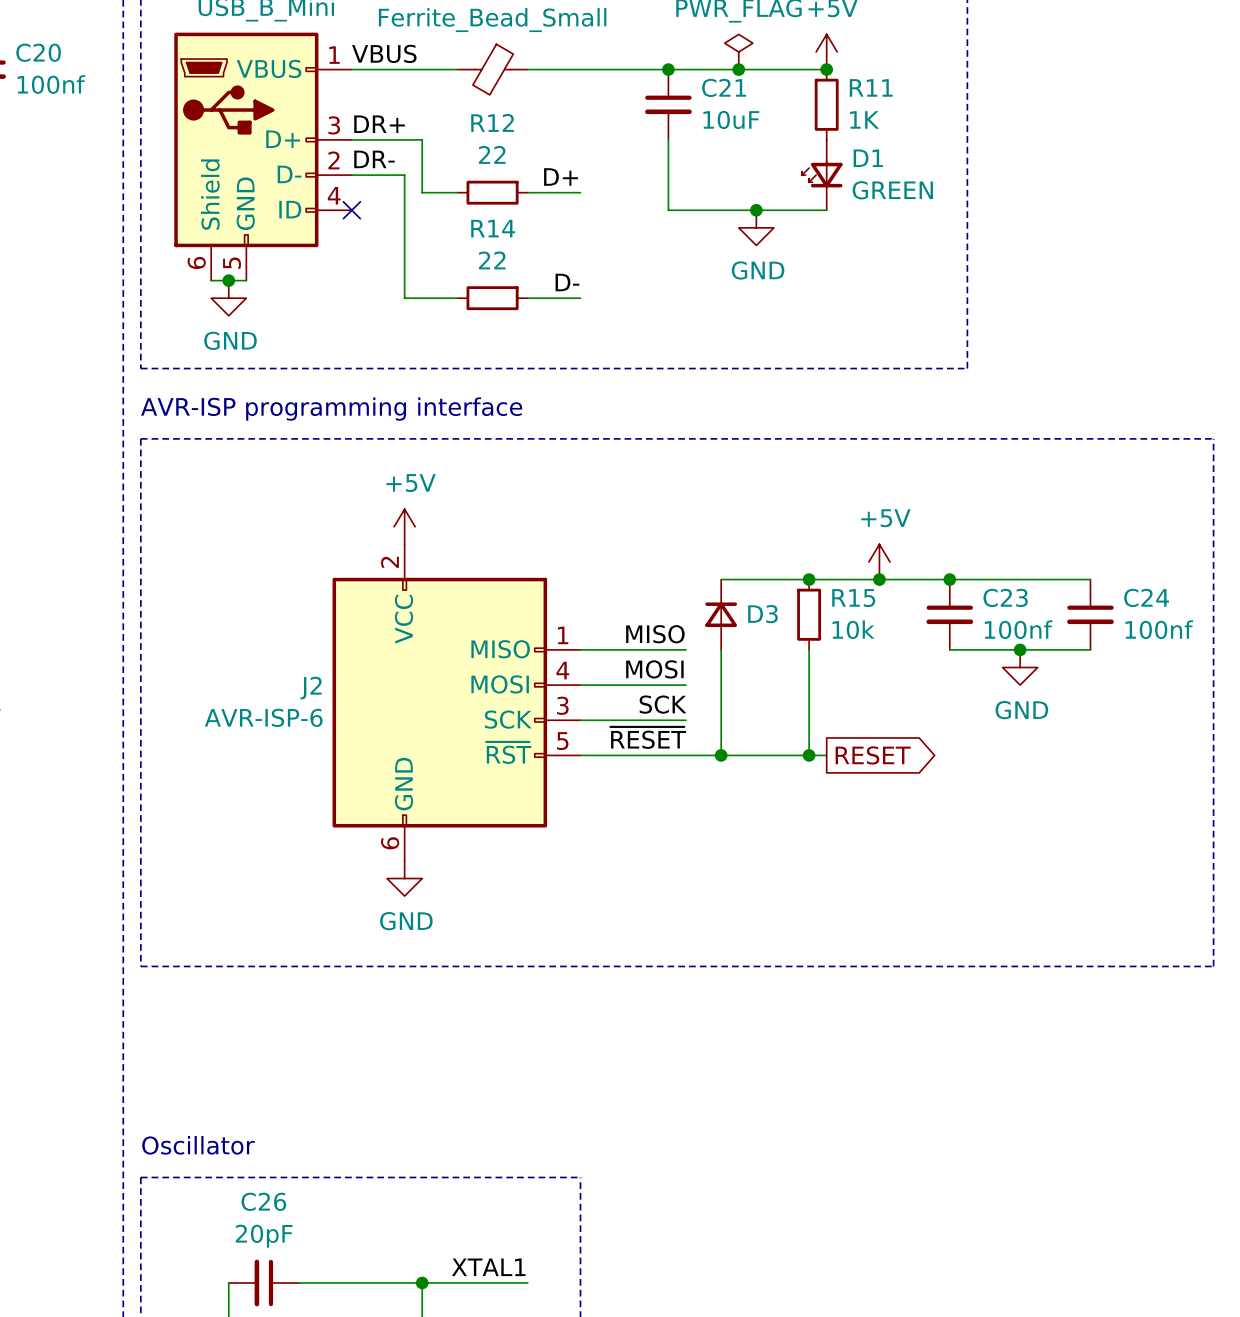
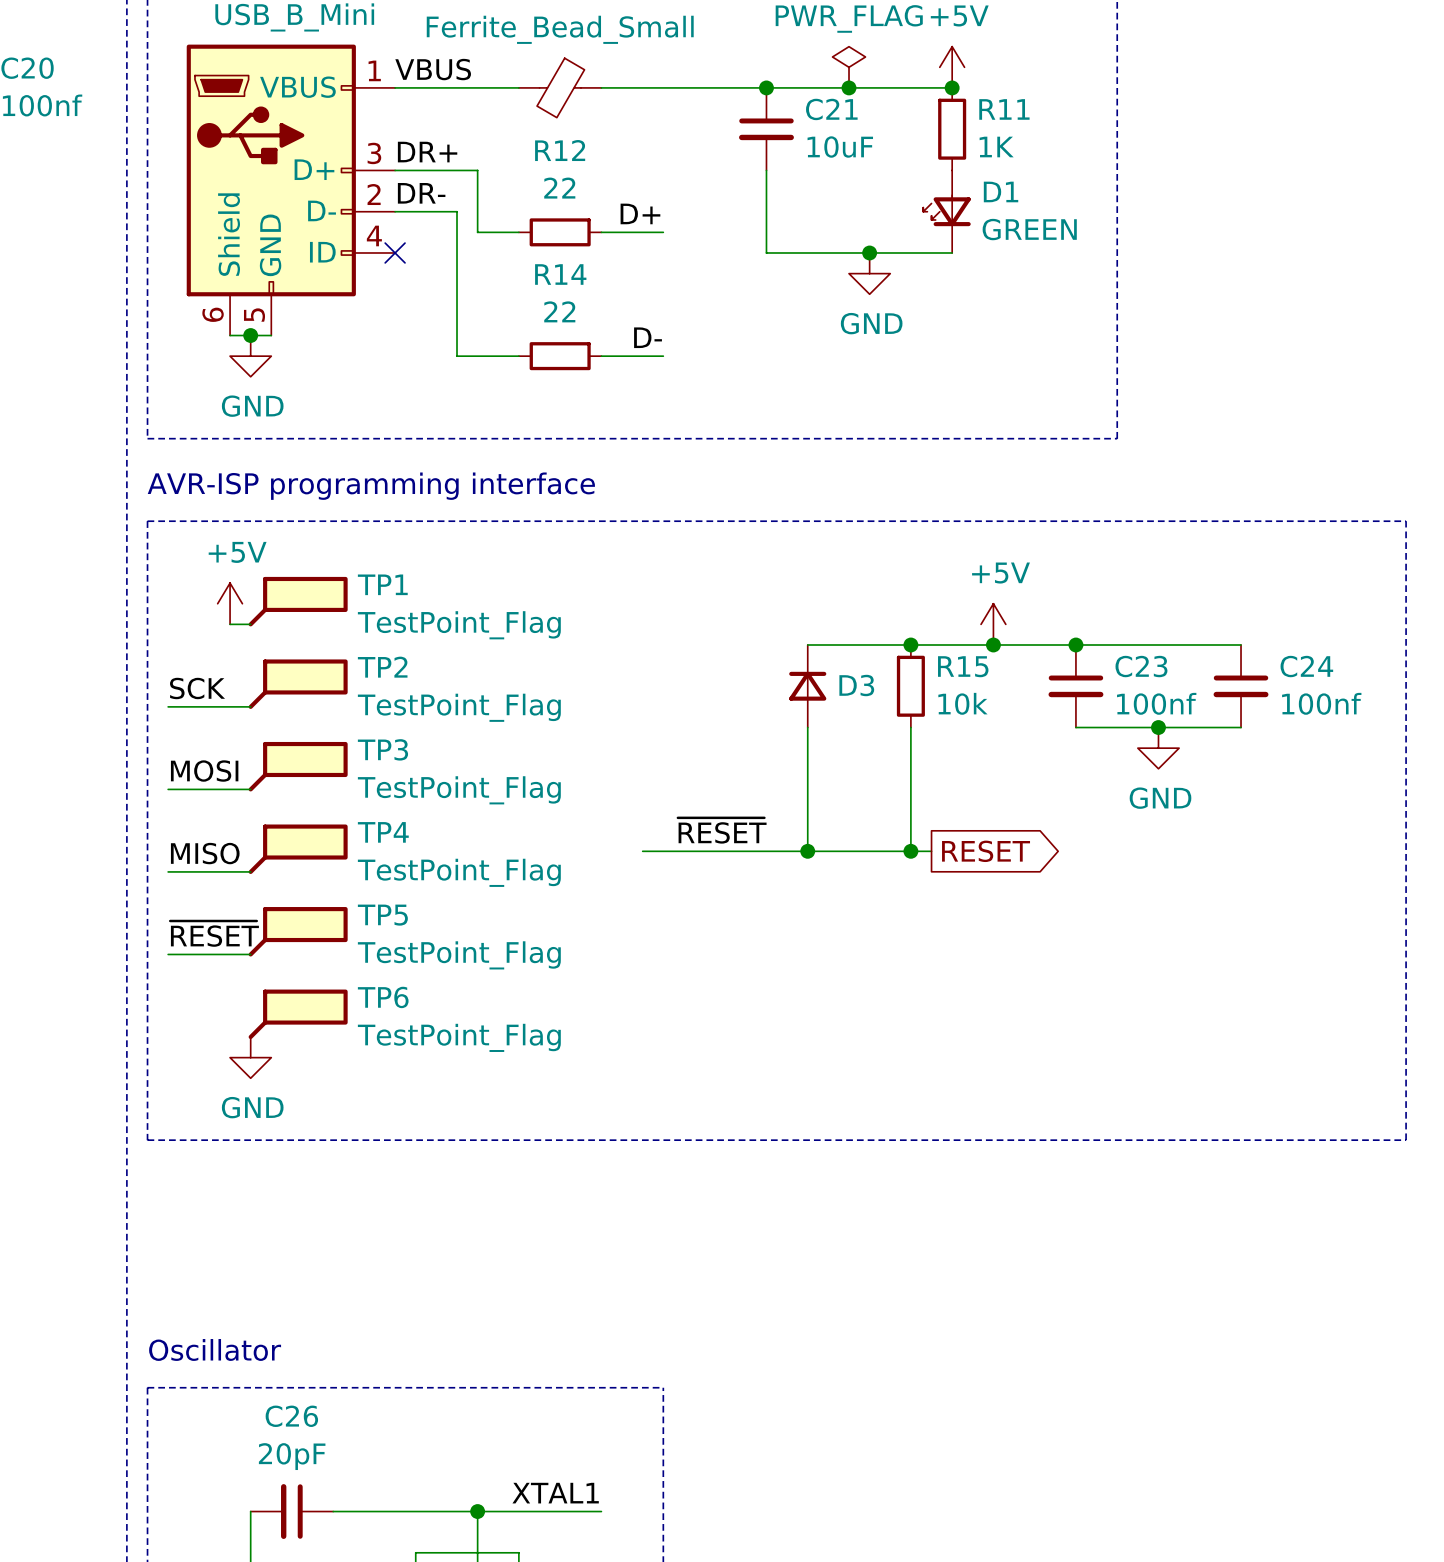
TP1: none -> TestPoint_Flag (298, 601)
wire: none -> (230, 624) (250, 624)
power symbol position: +5V (404, 526) -> +5V (230, 603)
junction: none -> (910, 645)
junction: none -> (993, 645)
junction: none -> (1075, 645)
power symbol position: +5V (879, 561) -> +5V (993, 624)
TP2: none -> TestPoint_Flag (298, 684)
wire: (721, 579) (1090, 579) -> (807, 645) (1241, 645)
junction: (809, 579) -> none
junction: (879, 579) -> none
junction: (949, 579) -> none
label: none -> SCK (197, 688)
wire: none -> (168, 706) (250, 706)
D3 position: (721, 614) -> (807, 686)
R15 position: (809, 614) -> (910, 686)
C23 position: (949, 614) -> (1075, 686)
junction: none -> (1158, 727)
C24 position: (1090, 614) -> (1241, 686)
label: MISO (655, 634) -> none
TP3: none -> TestPoint_Flag (298, 766)
wire: (580, 649) (686, 649) -> none
wire: (721, 649) (721, 755) -> (807, 727) (807, 851)
wire: (809, 649) (809, 755) -> (910, 727) (910, 851)
wire: (949, 649) (1090, 649) -> (1075, 727) (1241, 727)
junction: (1020, 649) -> none
label: none -> MOSI (204, 771)
wire: none -> (168, 789) (250, 789)
power symbol position: GND (1020, 667) -> GND (1158, 748)
label: MOSI (654, 669) -> none
wire: (580, 685) (686, 685) -> none
J2: AVR-ISP-6 (456, 702) -> none
label: SCK (663, 704) -> none
TP4: none -> TestPoint_Flag (298, 849)
wire: none -> (787, 851) (931, 851)
junction: none -> (807, 851)
junction: none -> (910, 851)
label: none -> MISO (205, 853)
wire: none -> (168, 871) (250, 871)
label position: ~{RESET} (648, 737) -> ~{RESET} (722, 830)
wire: (580, 755) (826, 755) -> none
junction: (721, 755) -> none
junction: (809, 755) -> none
global label position: RESET (873, 755) -> RESET (986, 851)
TP5: none -> TestPoint_Flag (298, 931)
label: none -> ~{RESET} (214, 933)
wire: none -> (168, 954) (250, 954)
TP6: none -> TestPoint_Flag (298, 1014)
power symbol position: GND (404, 878) -> GND (250, 1057)

